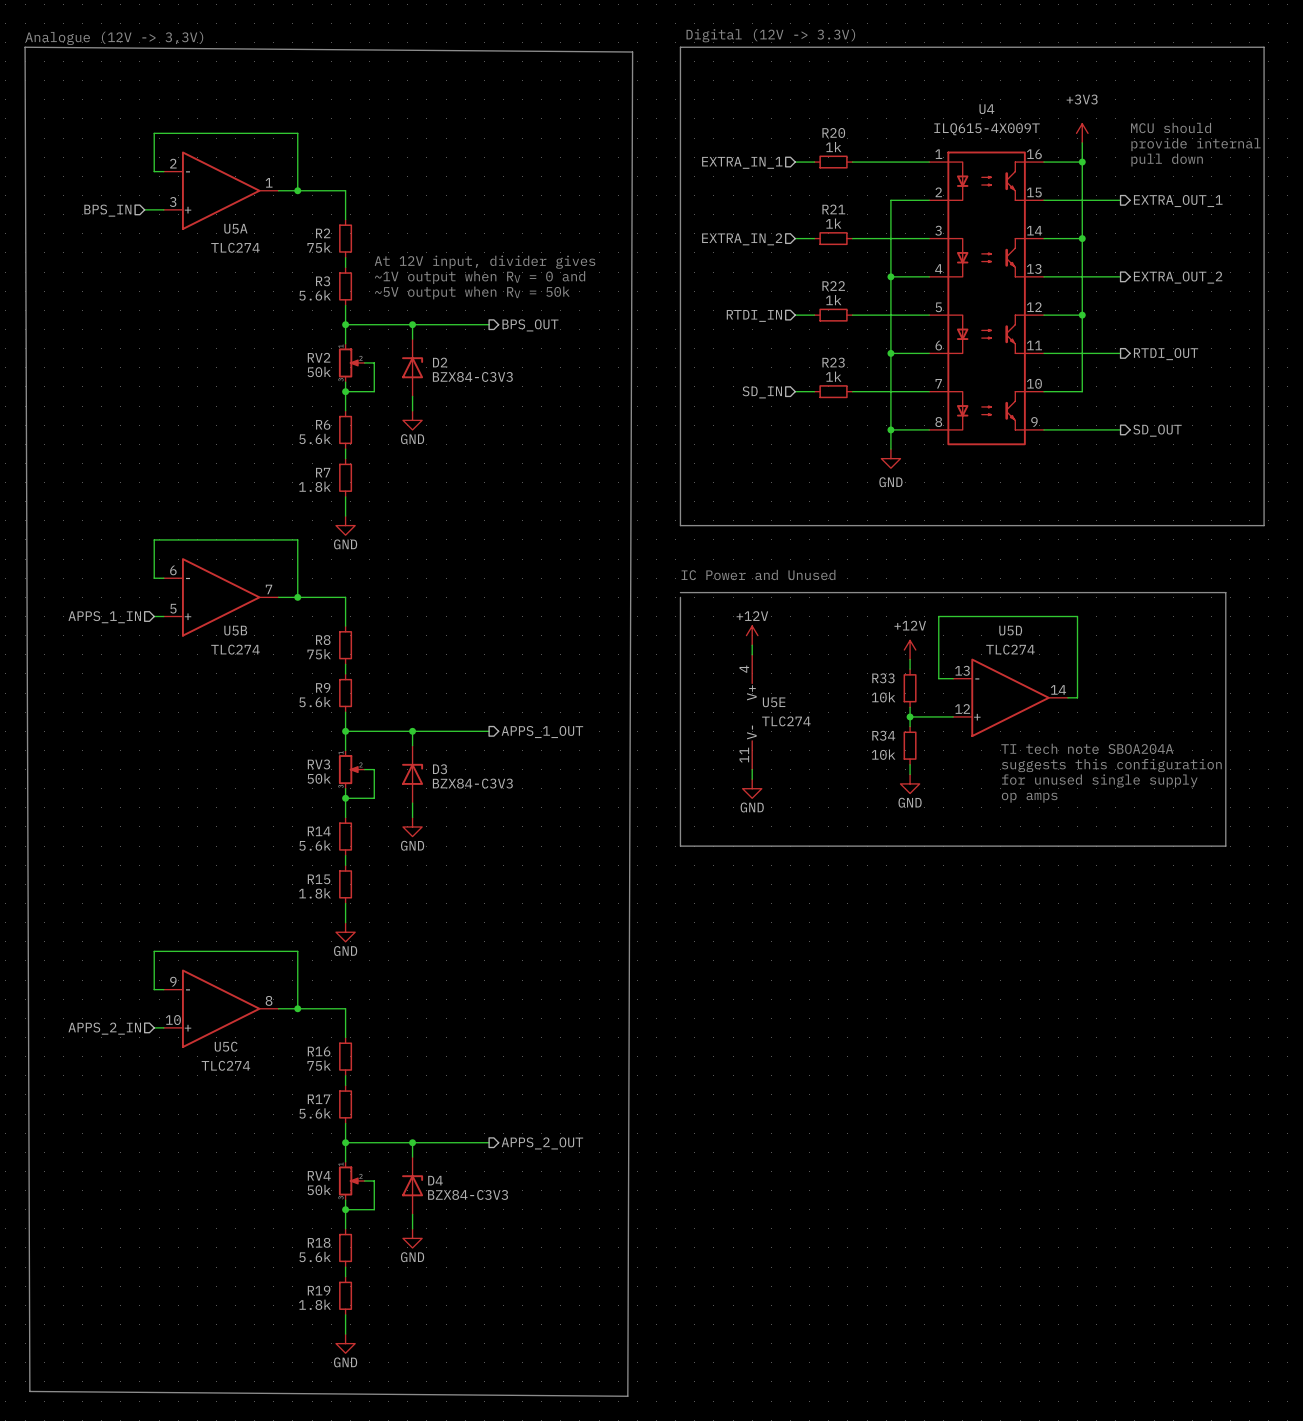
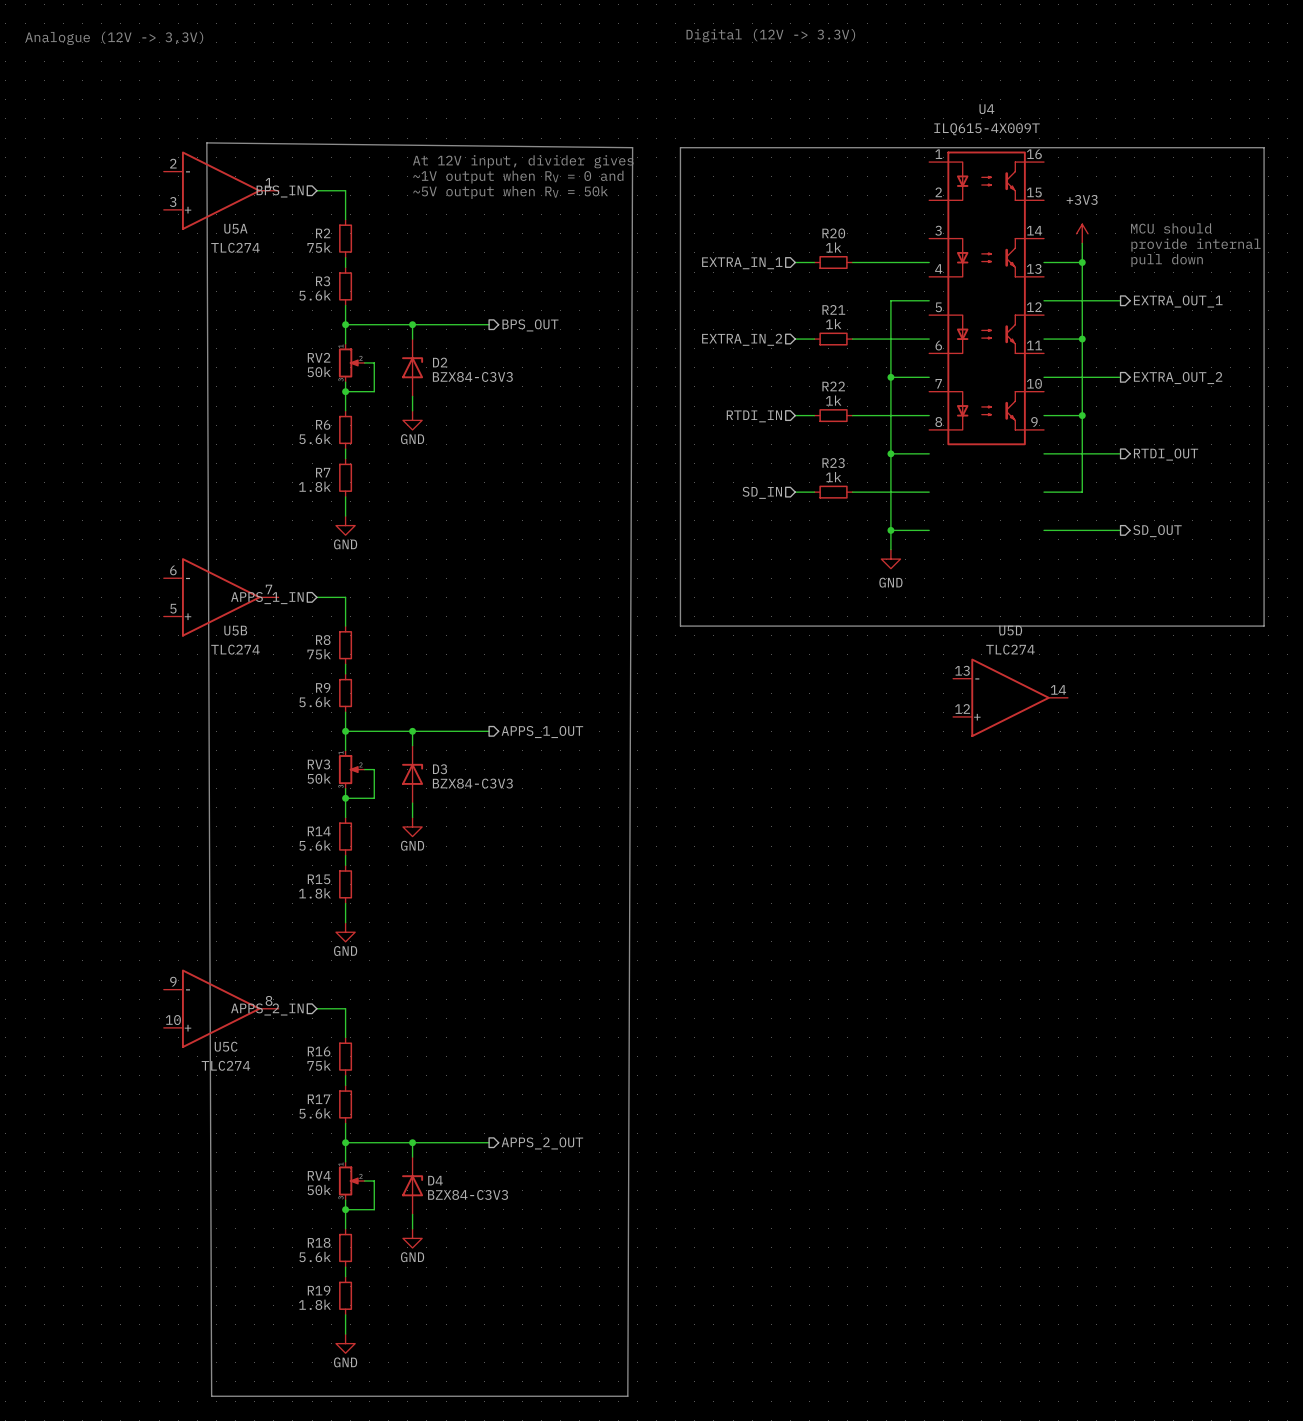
line: (25, 47) (632, 52) (627, 1396) (29, 1391) (25, 47) -> (206, 142) (211, 1396) (627, 1396) (632, 147) (206, 142)
text position: MCU should (1171, 127) -> MCU should (1171, 228)
power symbol position: +3V3 (1082, 133) -> +3V3 (1082, 233)
wire: (1082, 142) (1082, 243) -> none
text position: provide internal (1196, 144) -> provide internal (1196, 245)
line: (680, 147) (680, 47) (1264, 47) (1264, 147) -> (680, 147) (1264, 147)
text position: pull down (1167, 160) -> pull down (1167, 260)
hierarchical label position: EXTRA_IN_1 (742, 162) -> EXTRA_IN_1 (742, 263)
wire: (795, 162) (814, 162) -> (795, 262) (814, 262)
R20 position: (833, 162) -> (833, 262)
wire: (852, 162) (929, 162) -> (852, 262) (929, 262)
wire: (1044, 162) (1082, 162) -> (1044, 262) (1082, 262)
junction: (1082, 162) -> none
wire: (163, 171) (154, 171) (154, 133) (297, 133) (297, 190) -> none
wire: (278, 190) (316, 190) -> none
junction: (297, 190) -> none
wire: (929, 200) (890, 200) (890, 300) -> (929, 300) (890, 300)
wire: (1044, 200) (1120, 200) -> (1044, 300) (1120, 300)
hierarchical label position: EXTRA_OUT_1 (1178, 201) -> EXTRA_OUT_1 (1178, 301)
wire: (144, 209) (163, 209) -> none
hierarchical label position: BPS_IN (107, 210) -> BPS_IN (280, 191)
wire: (795, 238) (814, 238) -> (795, 339) (814, 339)
R21 position: (833, 238) -> (833, 339)
wire: (852, 238) (929, 238) -> (852, 339) (929, 339)
wire: (1044, 238) (1082, 238) -> (1044, 339) (1082, 339)
junction position: (1082, 238) -> (1082, 262)
hierarchical label position: EXTRA_IN_2 (742, 239) -> EXTRA_IN_2 (742, 339)
text position: At 12V input, divider gives (485, 262) -> At 12V input, divider gives (523, 161)
wire: (890, 276) (929, 276) -> (890, 377) (929, 377)
junction: (890, 276) -> none
wire: (1044, 276) (1120, 276) -> (1044, 377) (1120, 377)
text position: ~1V output when RV = 0 and (480, 277) -> ~1V output when RV = 0 and (518, 177)
hierarchical label position: EXTRA_OUT_2 (1178, 277) -> EXTRA_OUT_2 (1178, 378)
text position: ~5V output when RV = 50k (472, 292) -> ~5V output when RV = 50k (510, 192)
hierarchical label position: RTDI_IN (754, 315) -> RTDI_IN (754, 416)
wire: (795, 315) (814, 315) -> (795, 415) (814, 415)
R22 position: (833, 315) -> (833, 415)
wire: (852, 315) (929, 315) -> (852, 415) (929, 415)
wire: (1044, 315) (1082, 315) -> (1044, 415) (1082, 415)
junction position: (1082, 315) -> (1082, 339)
wire: (890, 353) (929, 353) -> (890, 453) (929, 453)
junction position: (890, 353) -> (890, 377)
wire: (1044, 353) (1120, 353) -> (1044, 453) (1120, 453)
hierarchical label position: RTDI_OUT (1166, 354) -> RTDI_OUT (1166, 454)
wire: (795, 391) (814, 391) -> (795, 492) (814, 492)
R23 position: (833, 391) -> (833, 492)
wire: (852, 391) (929, 391) -> (852, 492) (929, 492)
wire: (1044, 391) (1082, 391) -> (1044, 492) (1082, 492) (1082, 391)
hierarchical label position: SD_IN (762, 392) -> SD_IN (762, 492)
junction: none -> (1082, 415)
wire: (890, 429) (929, 429) -> (890, 530) (929, 530)
junction position: (890, 429) -> (890, 453)
wire: (1044, 429) (1120, 429) -> (1044, 530) (1120, 530)
hierarchical label position: SD_OUT (1157, 430) -> SD_OUT (1157, 531)
wire: none -> (890, 449) (890, 549)
power symbol position: GND (890, 458) -> GND (890, 559)
line: (680, 525) (1264, 525) -> (680, 626) (1264, 626) (1264, 525)
line: none -> (680, 525) (680, 597)
junction: none -> (890, 530)
text: IC Power and Unused (758, 574) -> none
wire: (163, 578) (154, 578) (154, 539) (297, 539) (297, 597) -> none
line: (680, 592) (1225, 592) (1225, 846) (680, 846) (680, 626) -> none
wire: (278, 597) (316, 597) -> none
junction: (297, 597) -> none
wire: (154, 616) (163, 616) -> none
hierarchical label position: APPS_1_IN (104, 617) -> APPS_1_IN (267, 598)
power symbol: +12V (752, 635) -> none
wire: (752, 645) (752, 654) -> none
power symbol: +12V (910, 649) -> none
wire: (910, 659) (910, 669) -> none
wire: (953, 678) (938, 678) (938, 616) (1077, 616) (1077, 697) (1067, 697) -> none
R33: 10k (910, 688) -> none
wire: (910, 707) (910, 726) -> none
U5E: TLC274 (752, 712) -> none
wire: (910, 716) (953, 716) -> none
junction: (910, 716) -> none
R34: 10k (910, 745) -> none
text: TI tech note SBOA204A (1087, 748) -> none
wire: (910, 764) (910, 774) -> none
text: suggests this configuration (1111, 765) -> none
wire: (752, 769) (752, 779) -> none
text: for unused single supply (1099, 780) -> none
power symbol: GND (910, 783) -> none
power symbol: GND (752, 788) -> none
text: op amps (1029, 797) -> none
wire: (163, 989) (154, 989) (154, 951) (297, 951) (297, 1008) -> none
wire: (278, 1008) (316, 1008) -> none
junction: (297, 1008) -> none
wire: (154, 1027) (163, 1027) -> none
hierarchical label position: APPS_2_IN (104, 1028) -> APPS_2_IN (267, 1009)

